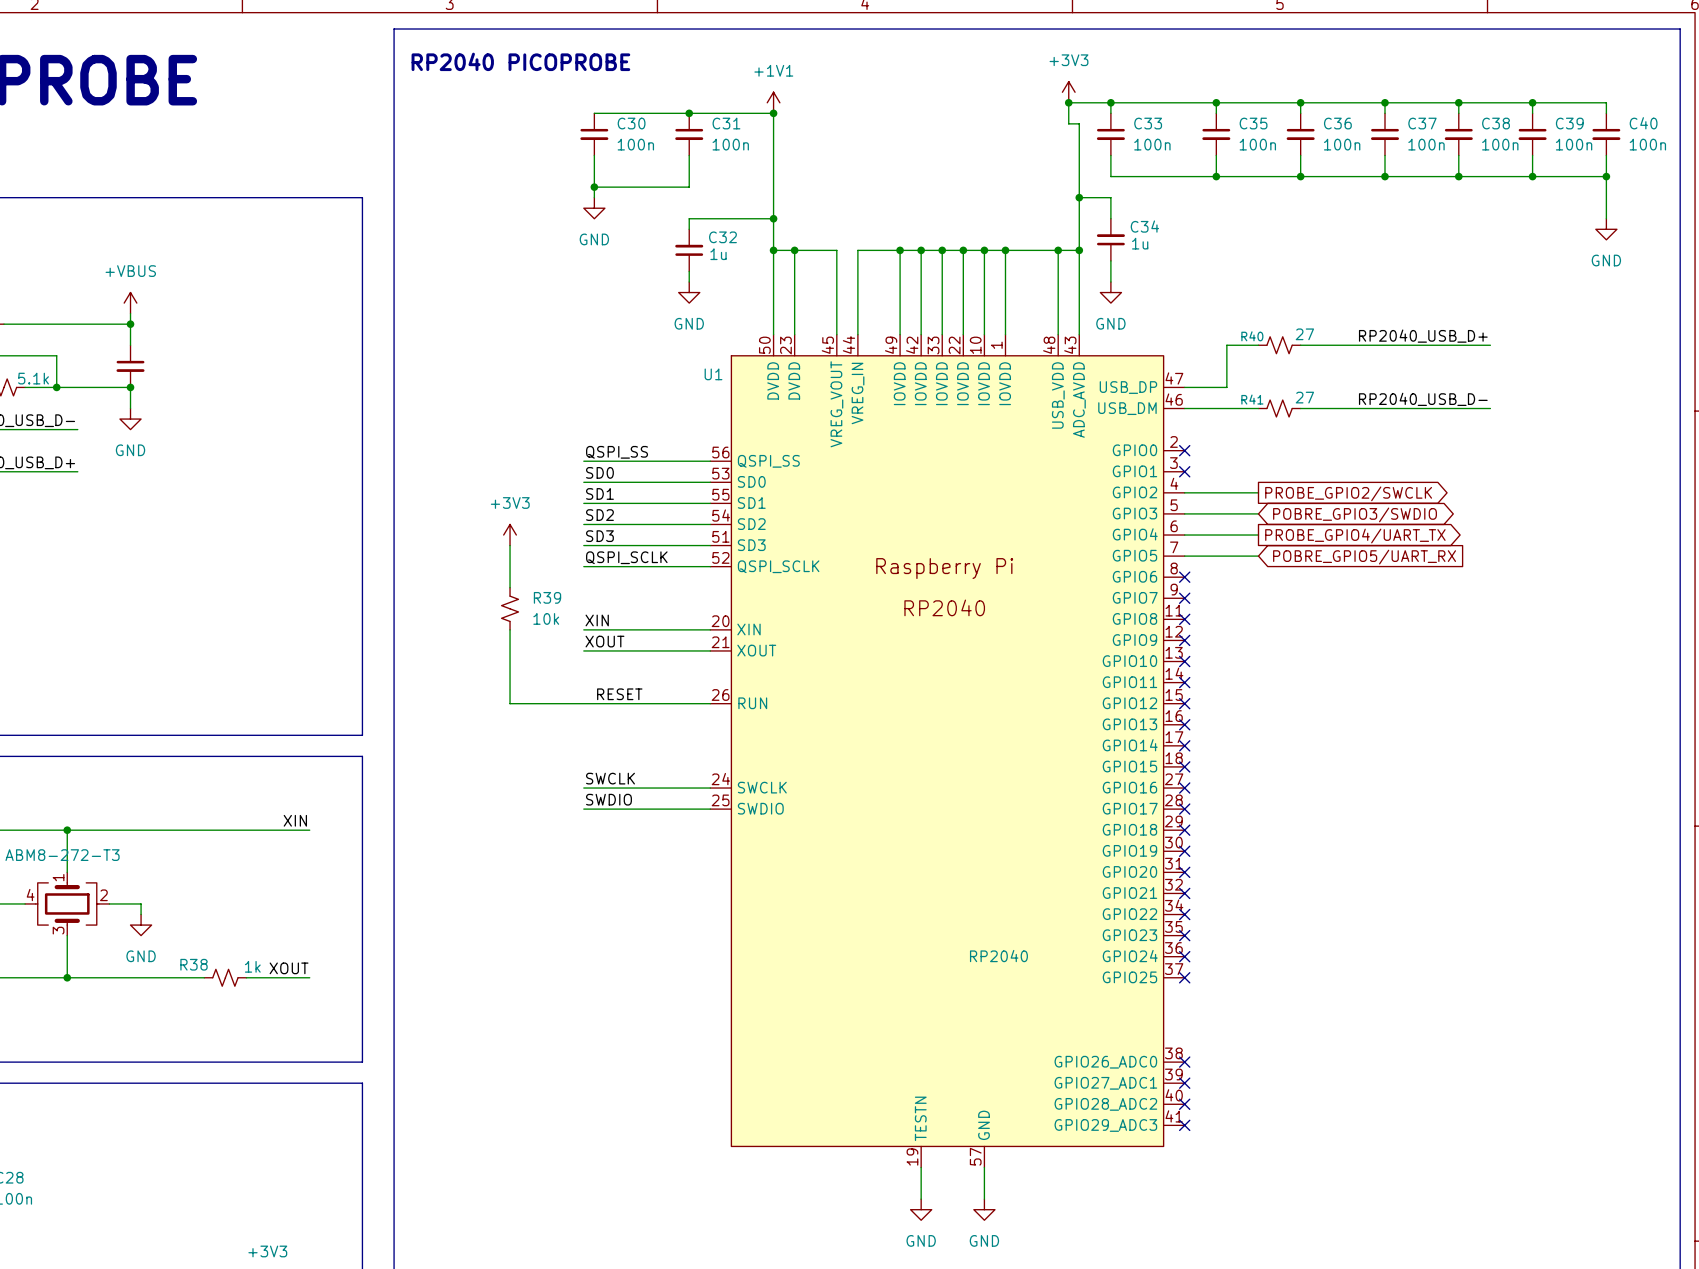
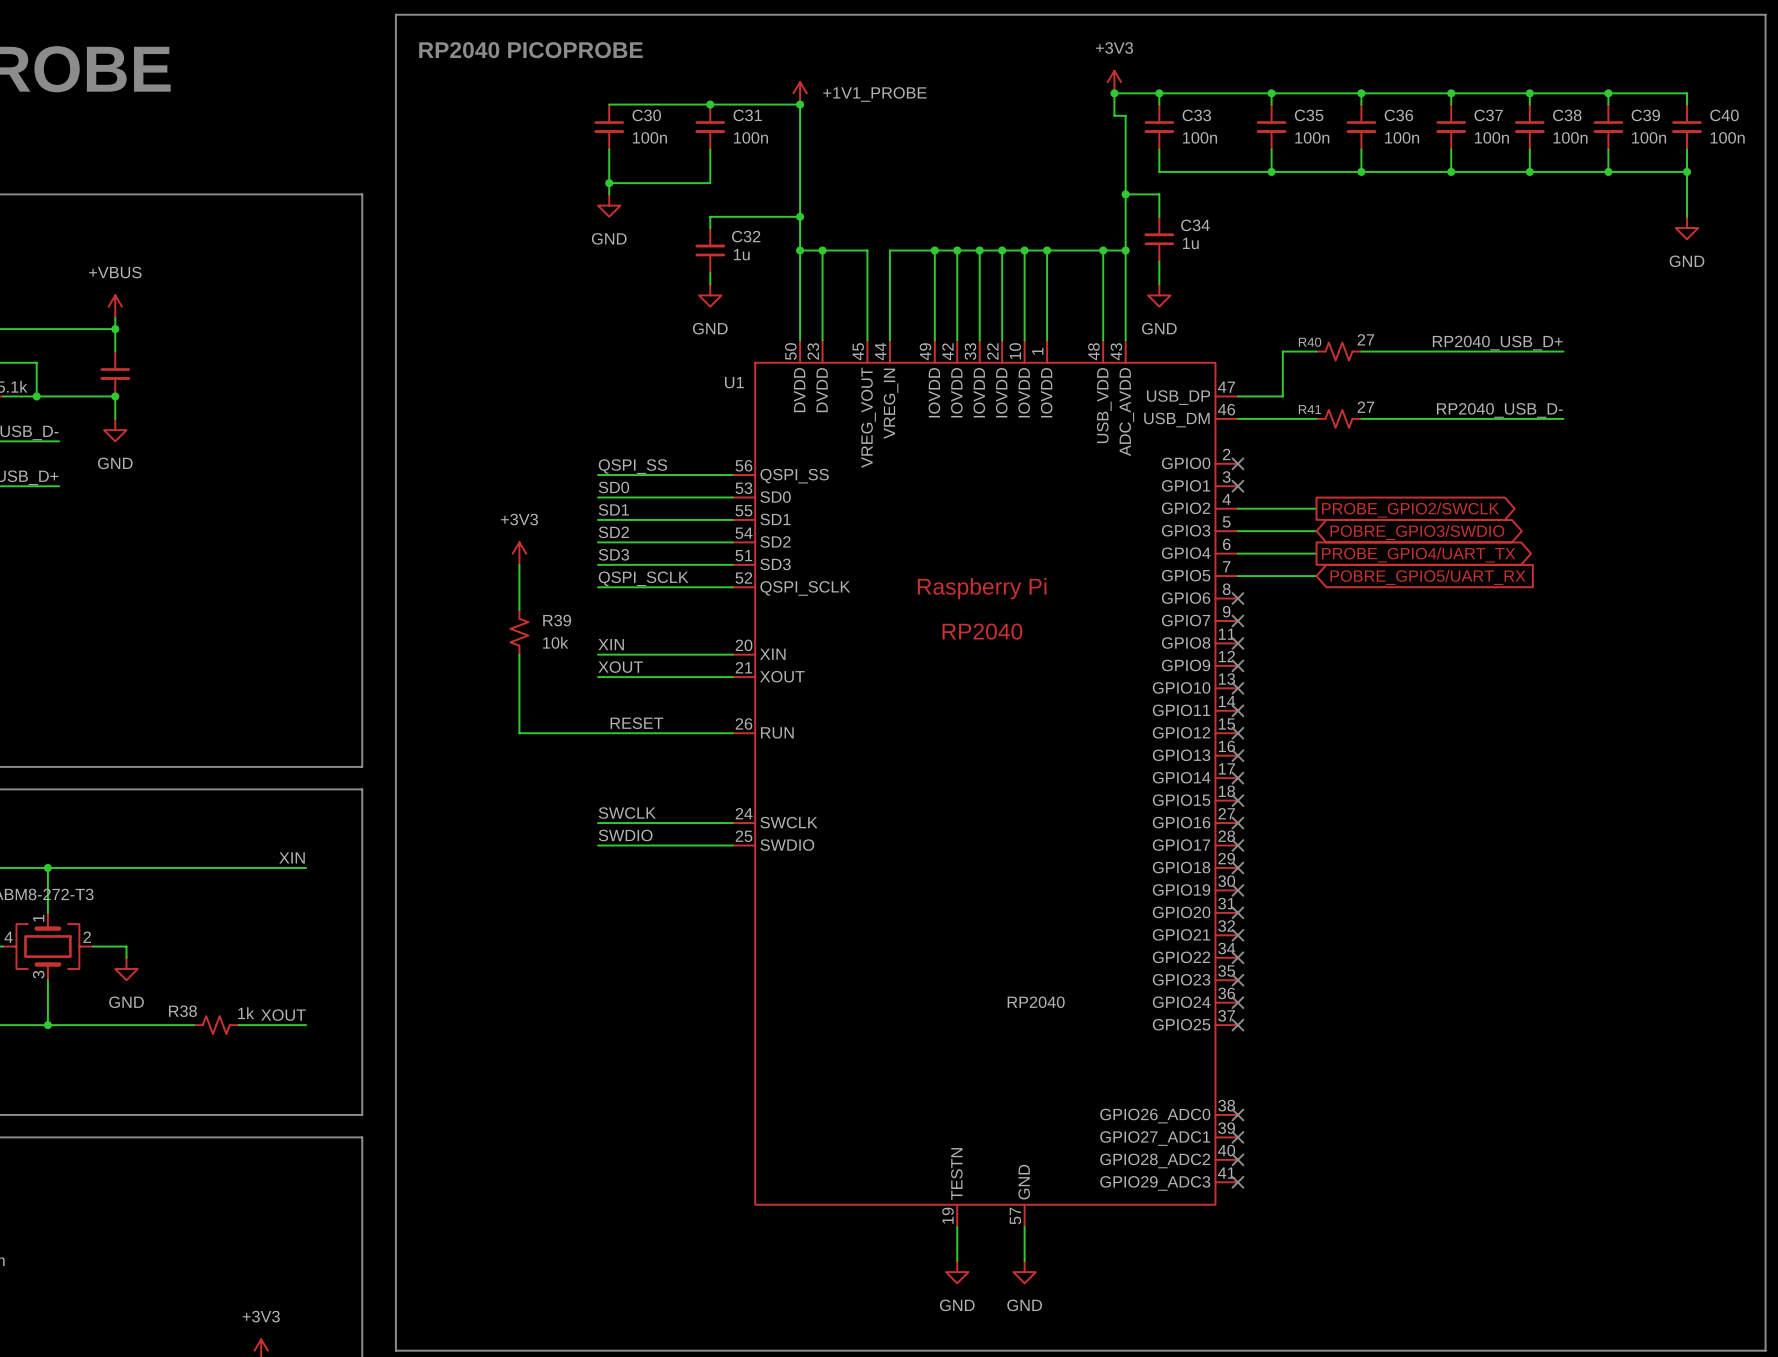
power symbol: +1V1 (773, 102) -> +1V1_PROBE (800, 93)

